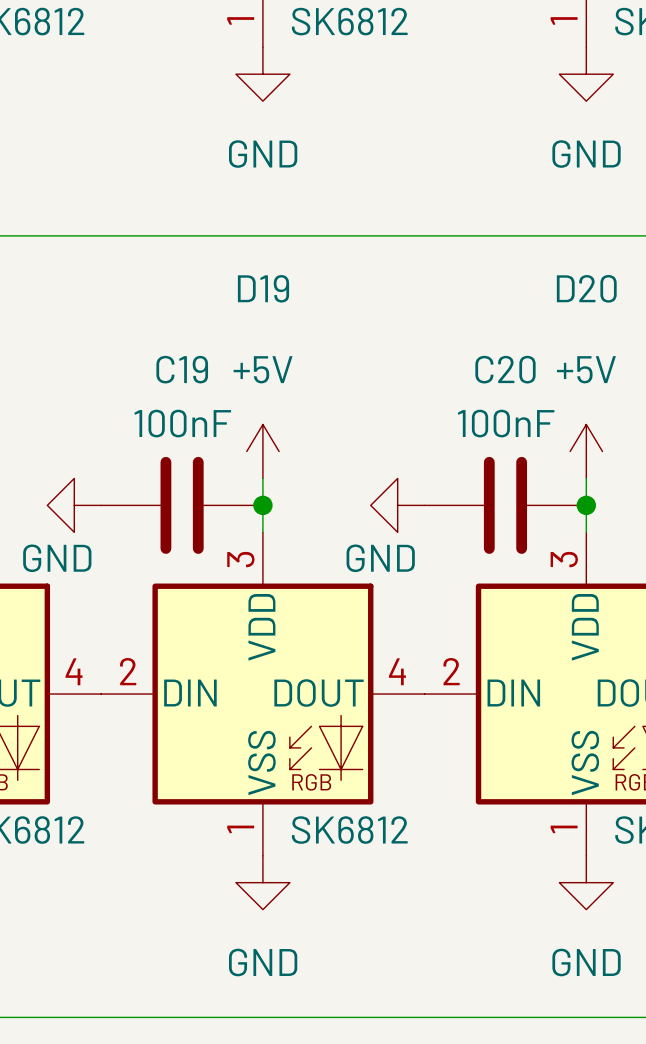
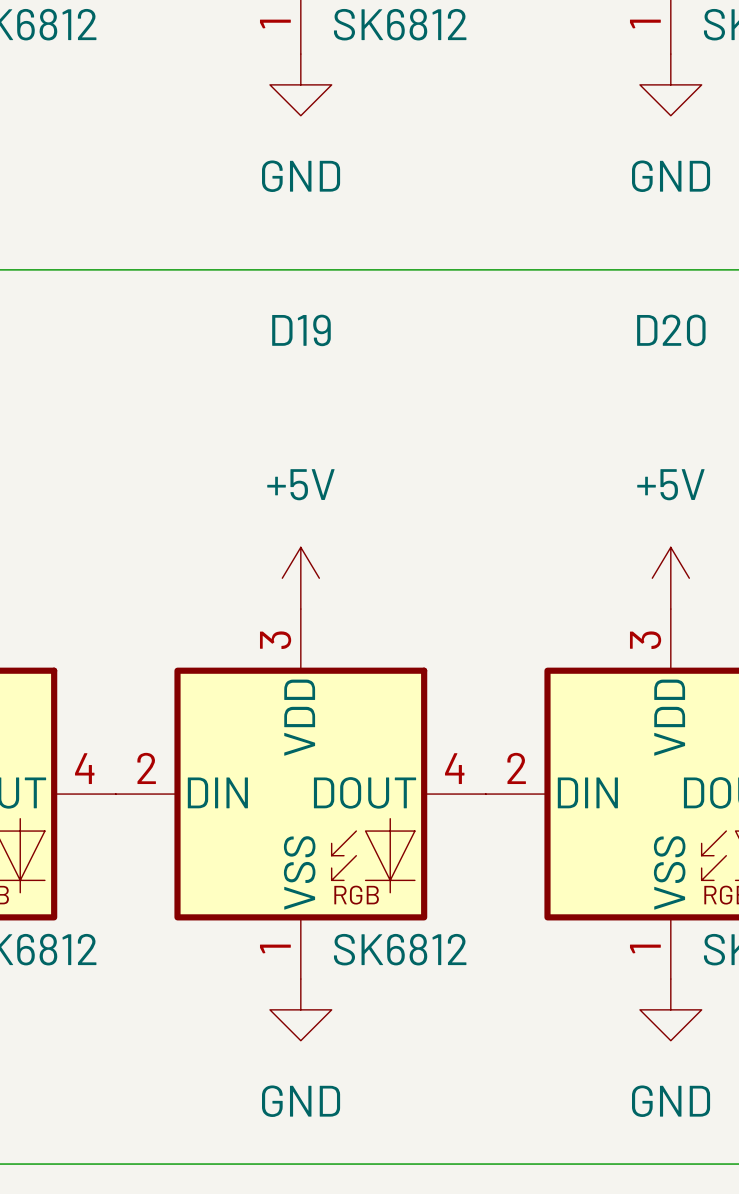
power symbol position: +5V (262, 451) -> +5V (300, 578)
power symbol position: +5V (586, 451) -> +5V (670, 578)
power symbol: GND (74, 505) -> none
C19: 100nF (182, 505) -> none
junction: (262, 505) -> none
power symbol: GND (397, 505) -> none
C20: 100nF (505, 505) -> none
junction: (586, 505) -> none

